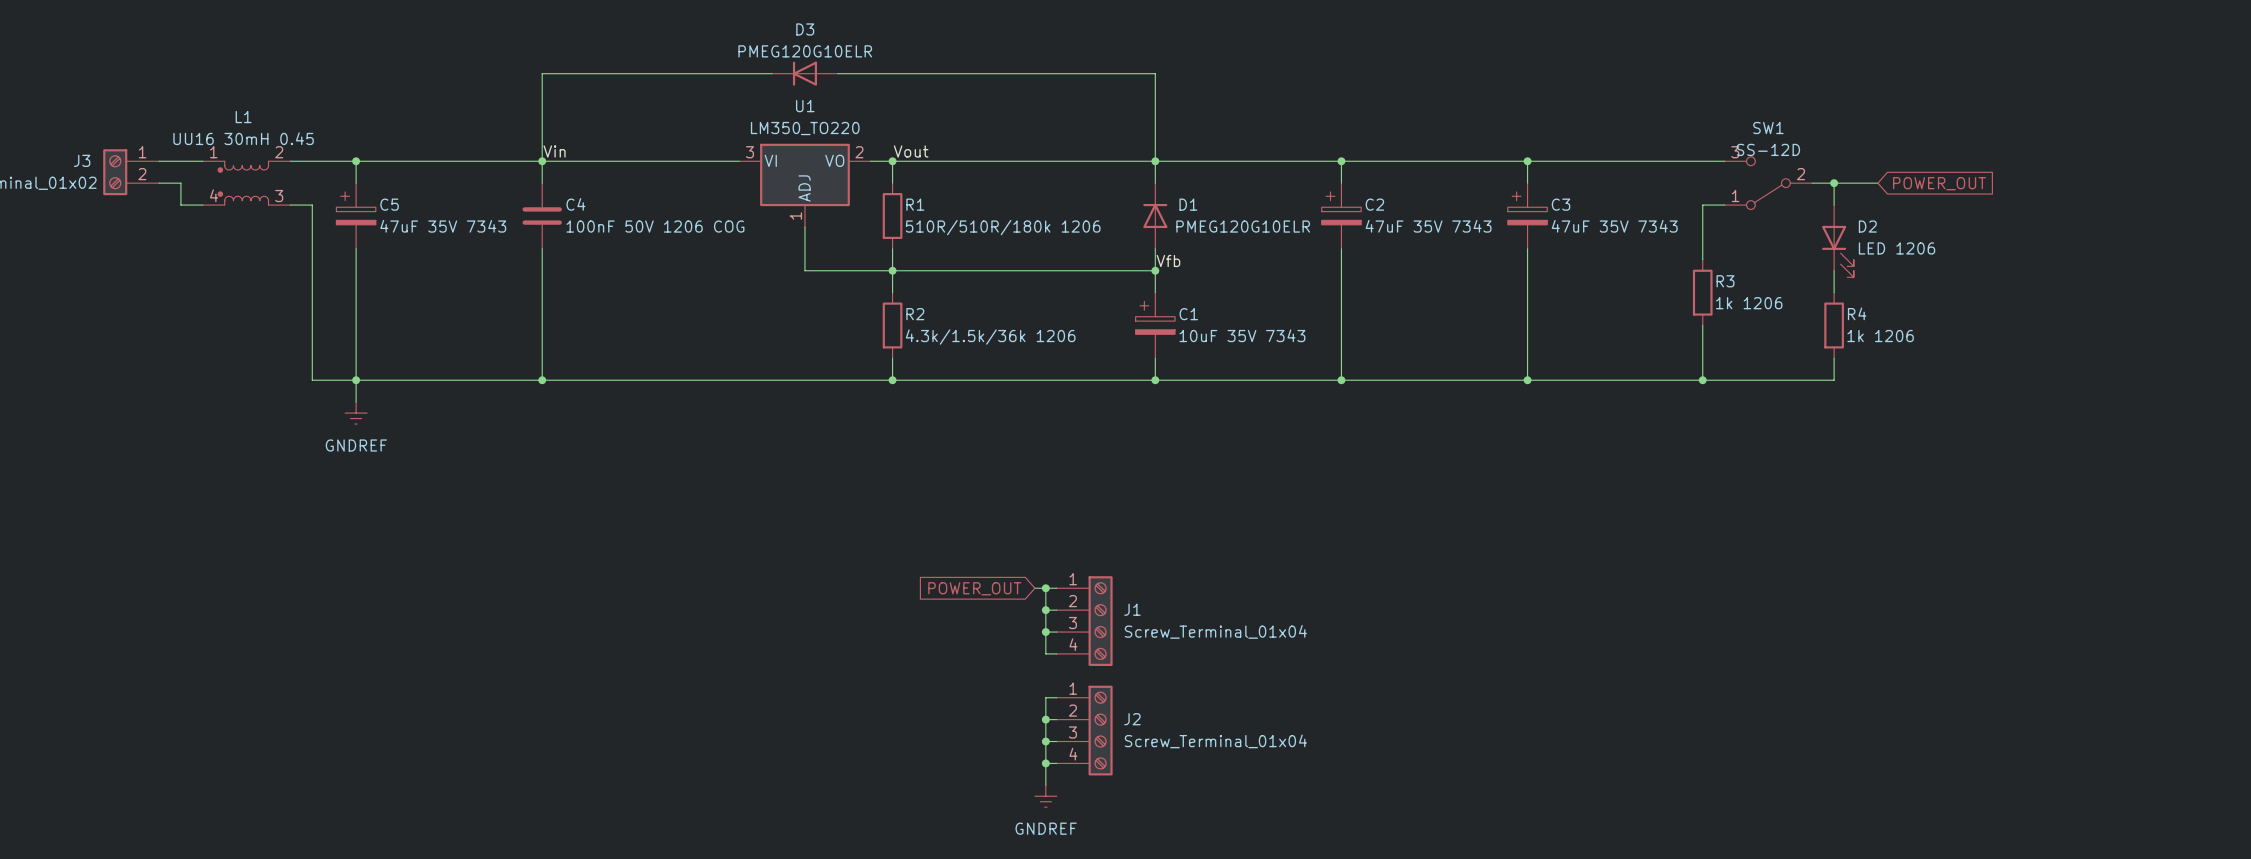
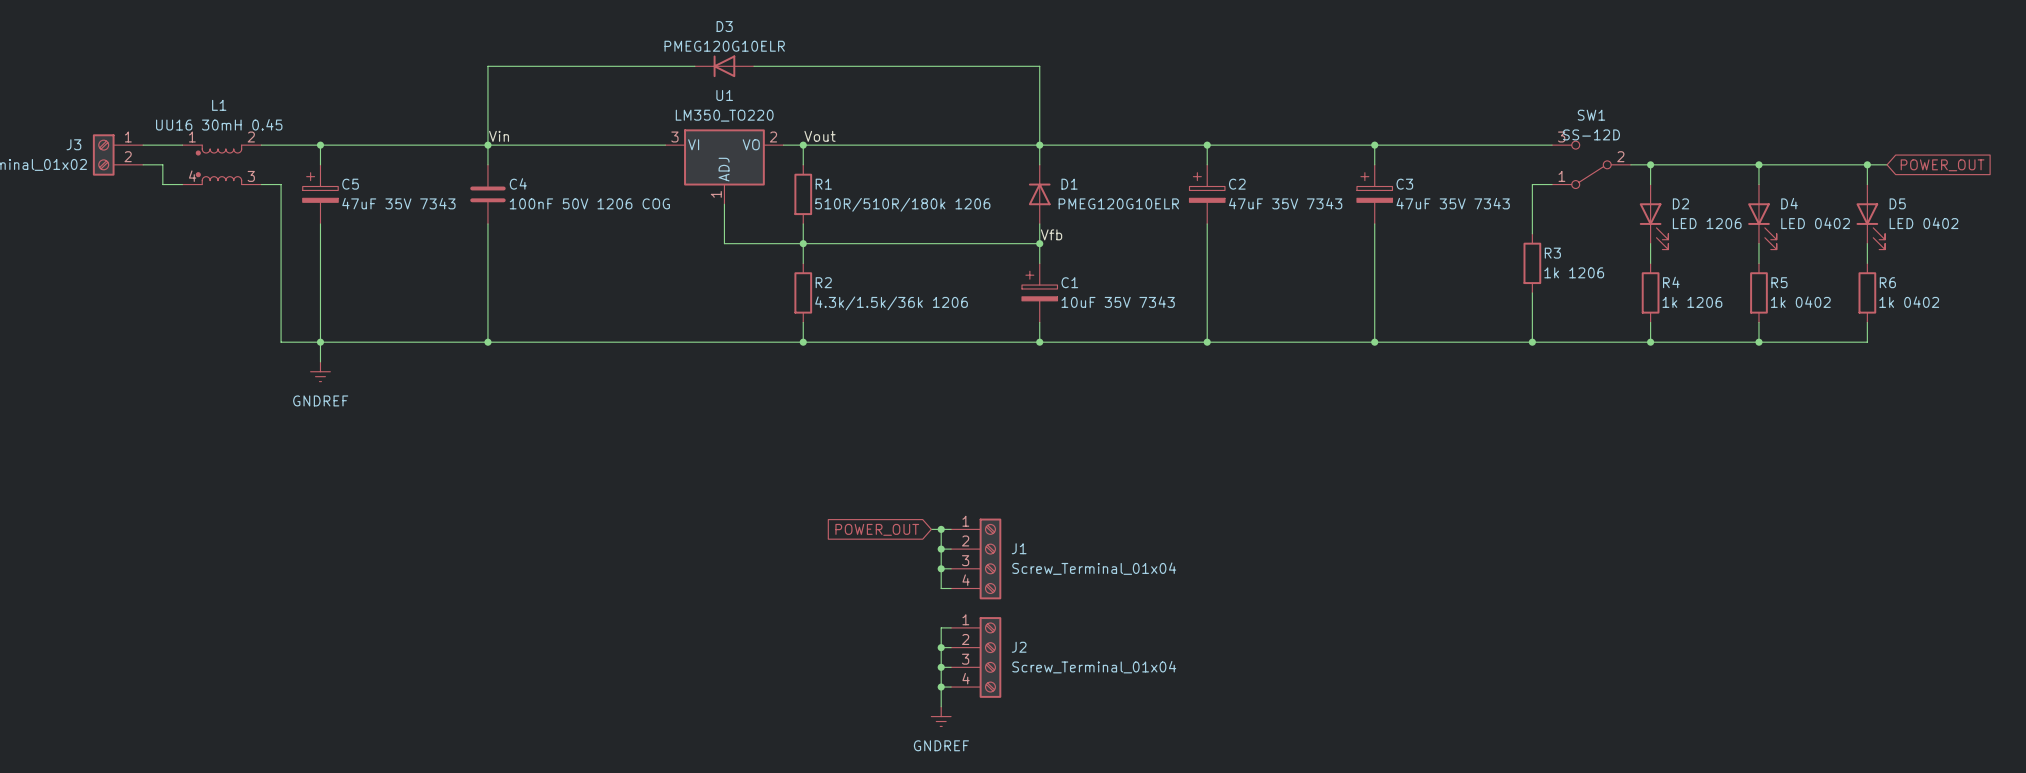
wire: none -> (1690, 164) (1887, 164)
global label: POWER_OUT (1939, 183) -> none
wire: none -> (1758, 164) (1758, 184)
junction: none -> (1758, 164)
wire: none -> (1867, 164) (1867, 184)
junction: none -> (1867, 164)
global label: none -> POWER_OUT (1942, 165)
D4: none -> LED 0402 (1762, 217)
D5: none -> LED 0402 (1870, 217)
wire: none -> (1758, 243) (1758, 263)
wire: none -> (1867, 243) (1867, 263)
R5: none -> 1k 0402 (1758, 292)
R6: none -> 1k 0402 (1867, 292)
wire: none -> (1758, 322) (1758, 342)
wire: none -> (1867, 322) (1867, 342) (1650, 342)
junction: none -> (1650, 342)
junction: none -> (1758, 342)

